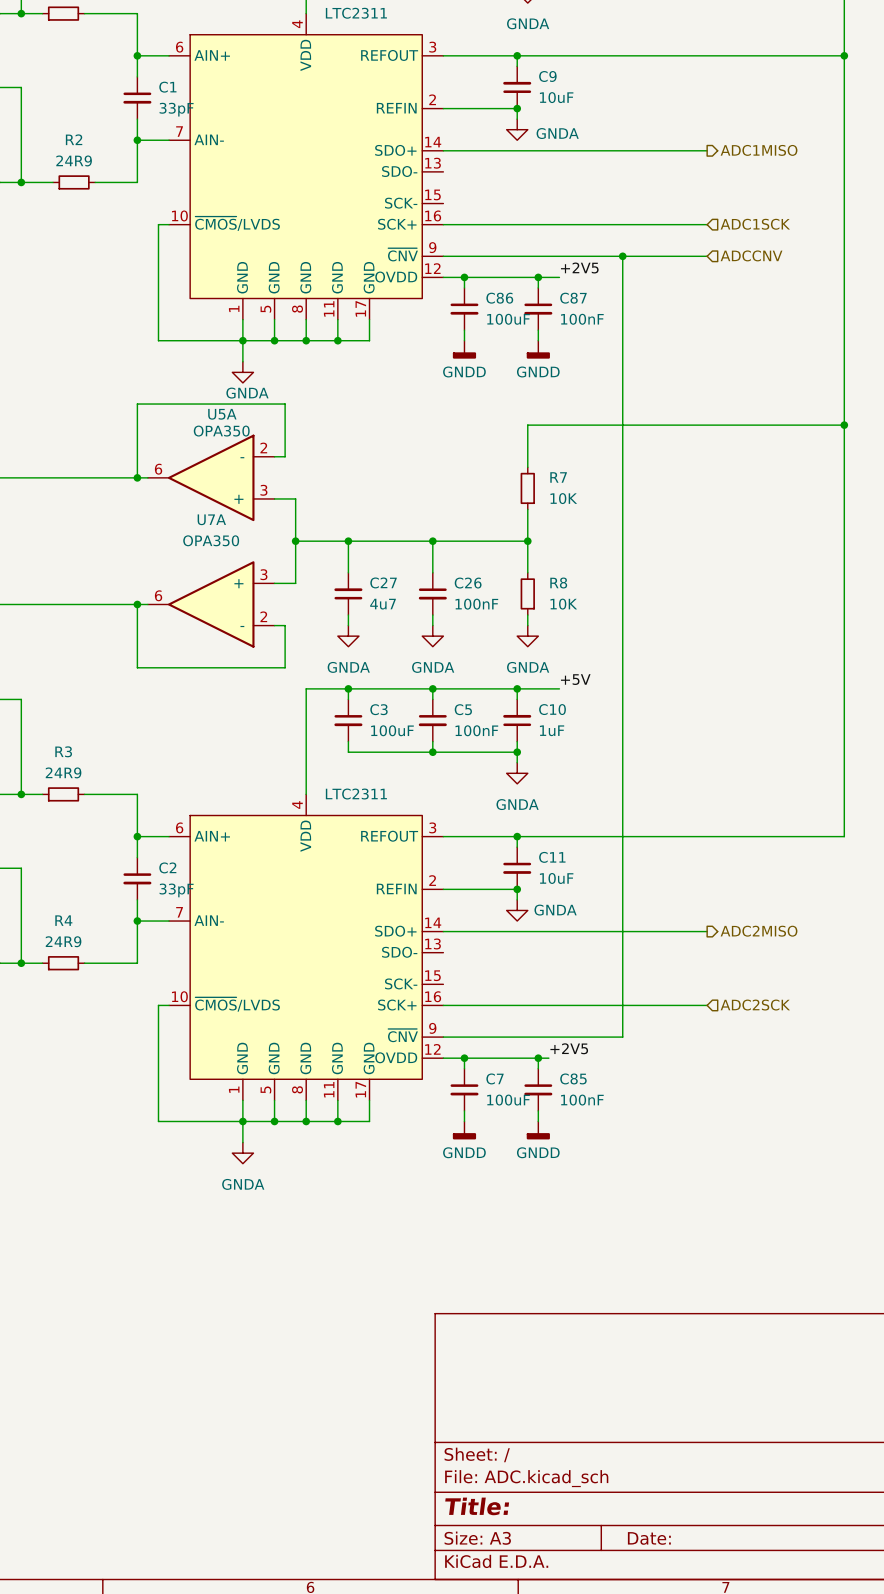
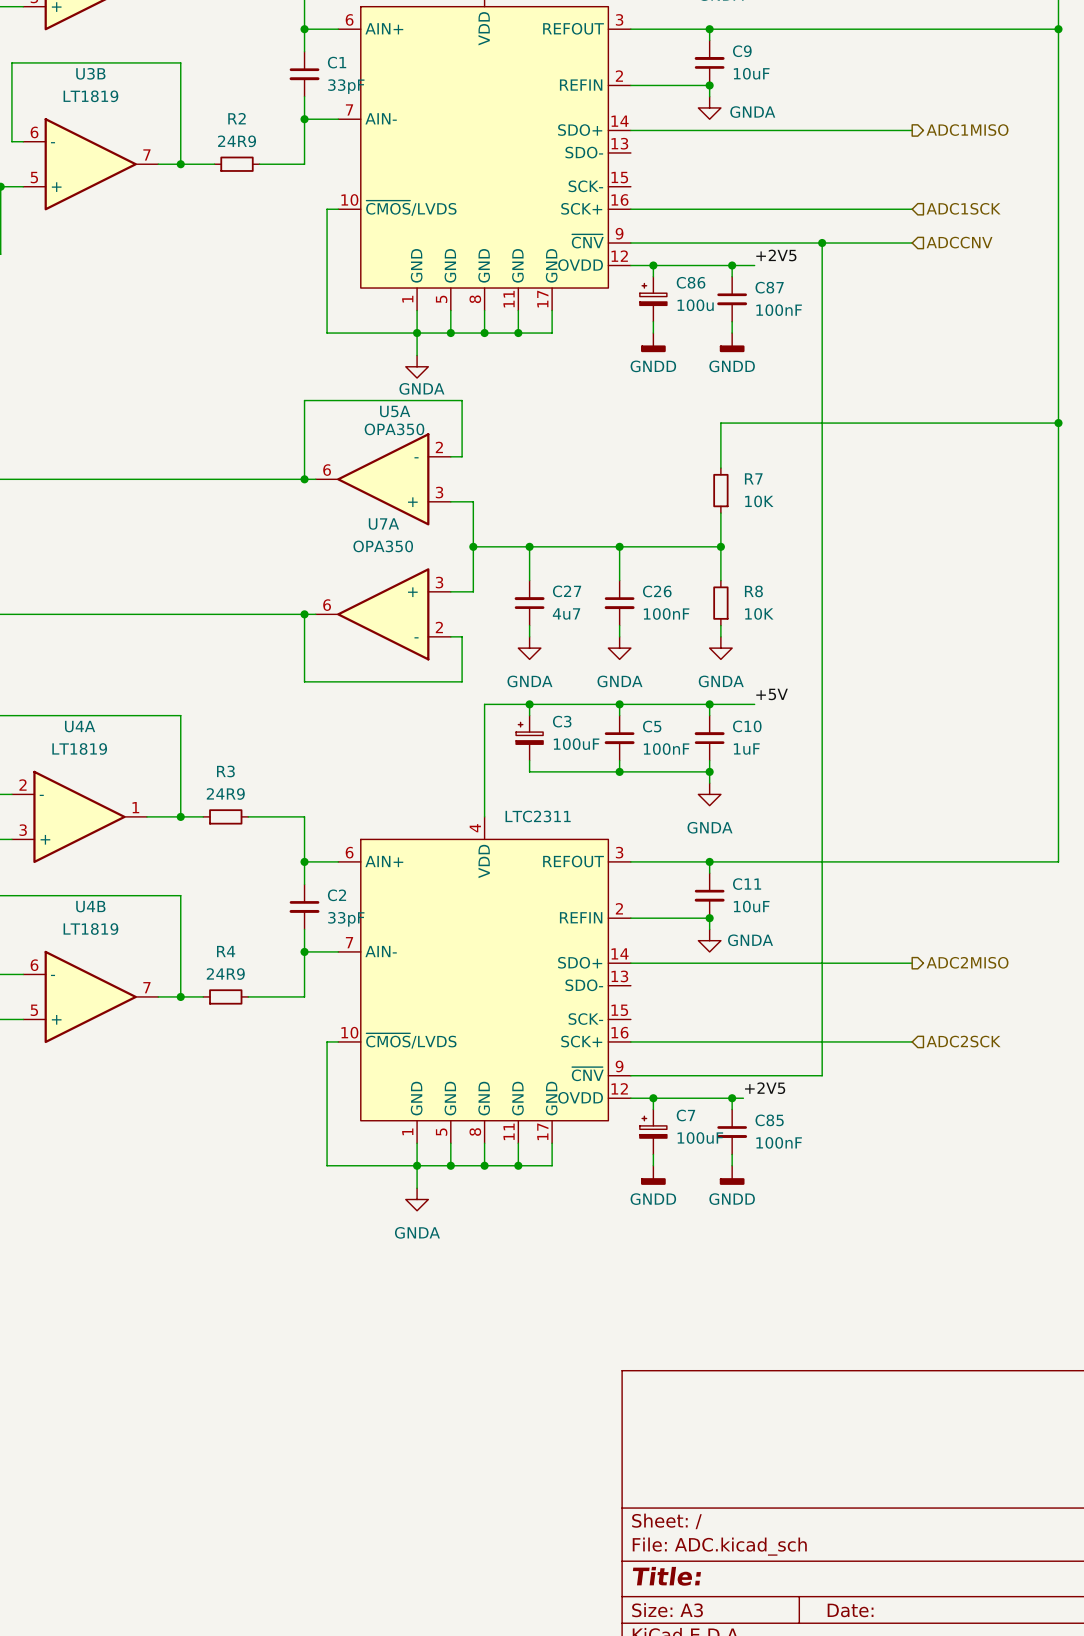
C86 symbol: [450, 287, 479, 331] -> [639, 276, 667, 322]
C86 value: 100uF (508, 319) -> 100u (695, 305)
C3 symbol: [334, 699, 363, 742] -> [516, 715, 544, 761]
C7 symbol: [450, 1068, 479, 1111] -> [639, 1109, 667, 1155]

